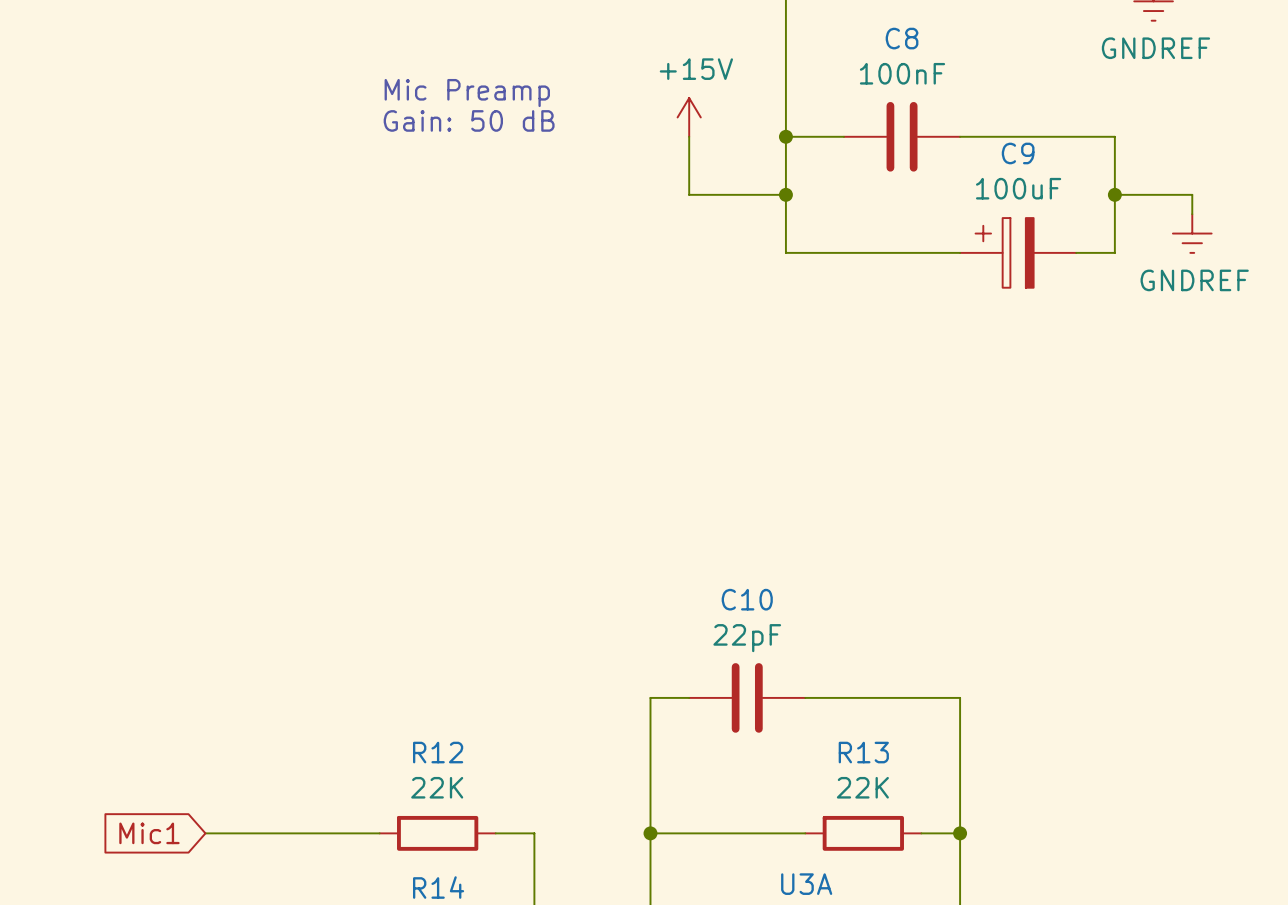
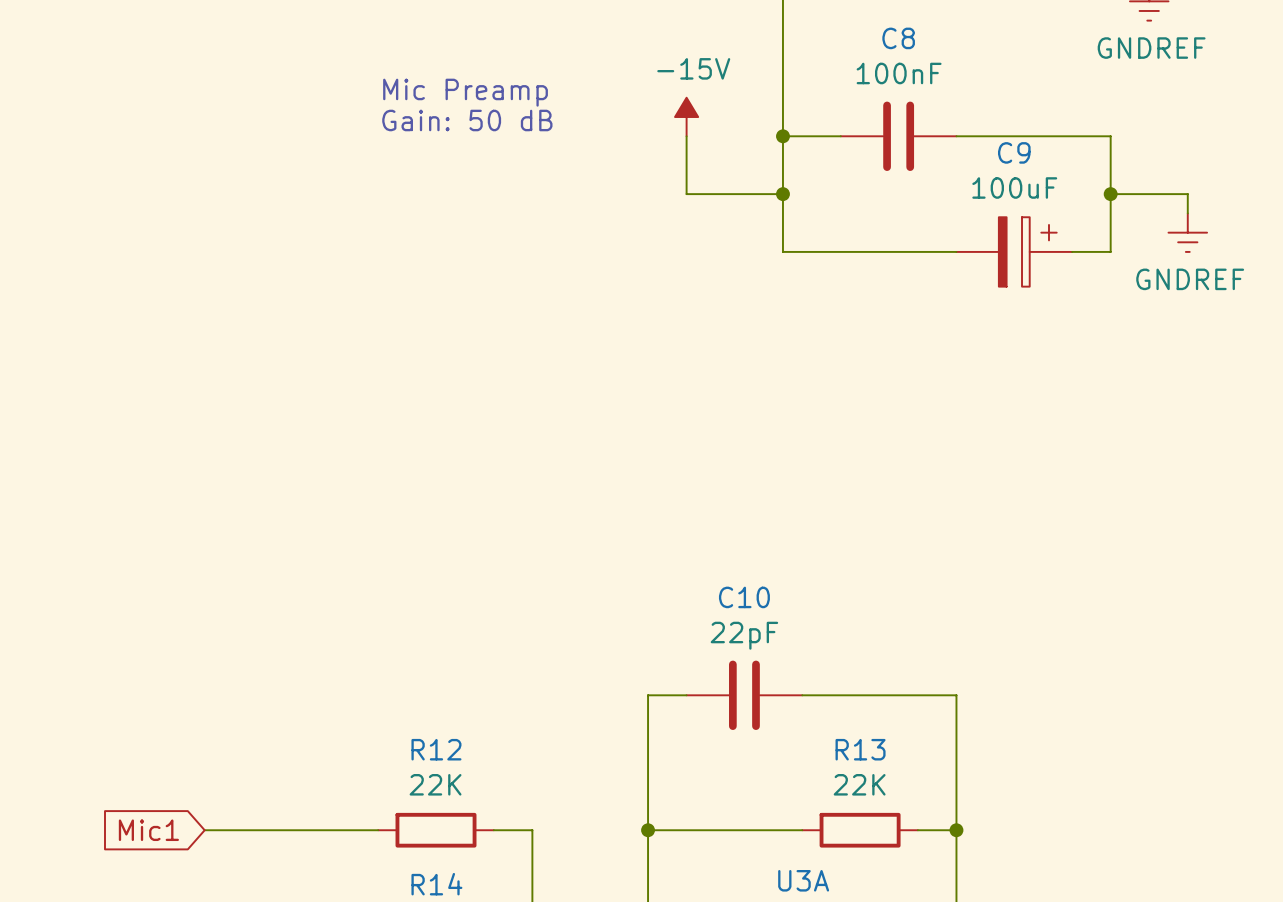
power symbol: +15V (689, 117) -> -15V (686, 117)
C9 flip: as is (1004, 252) -> left-right (1027, 251)

